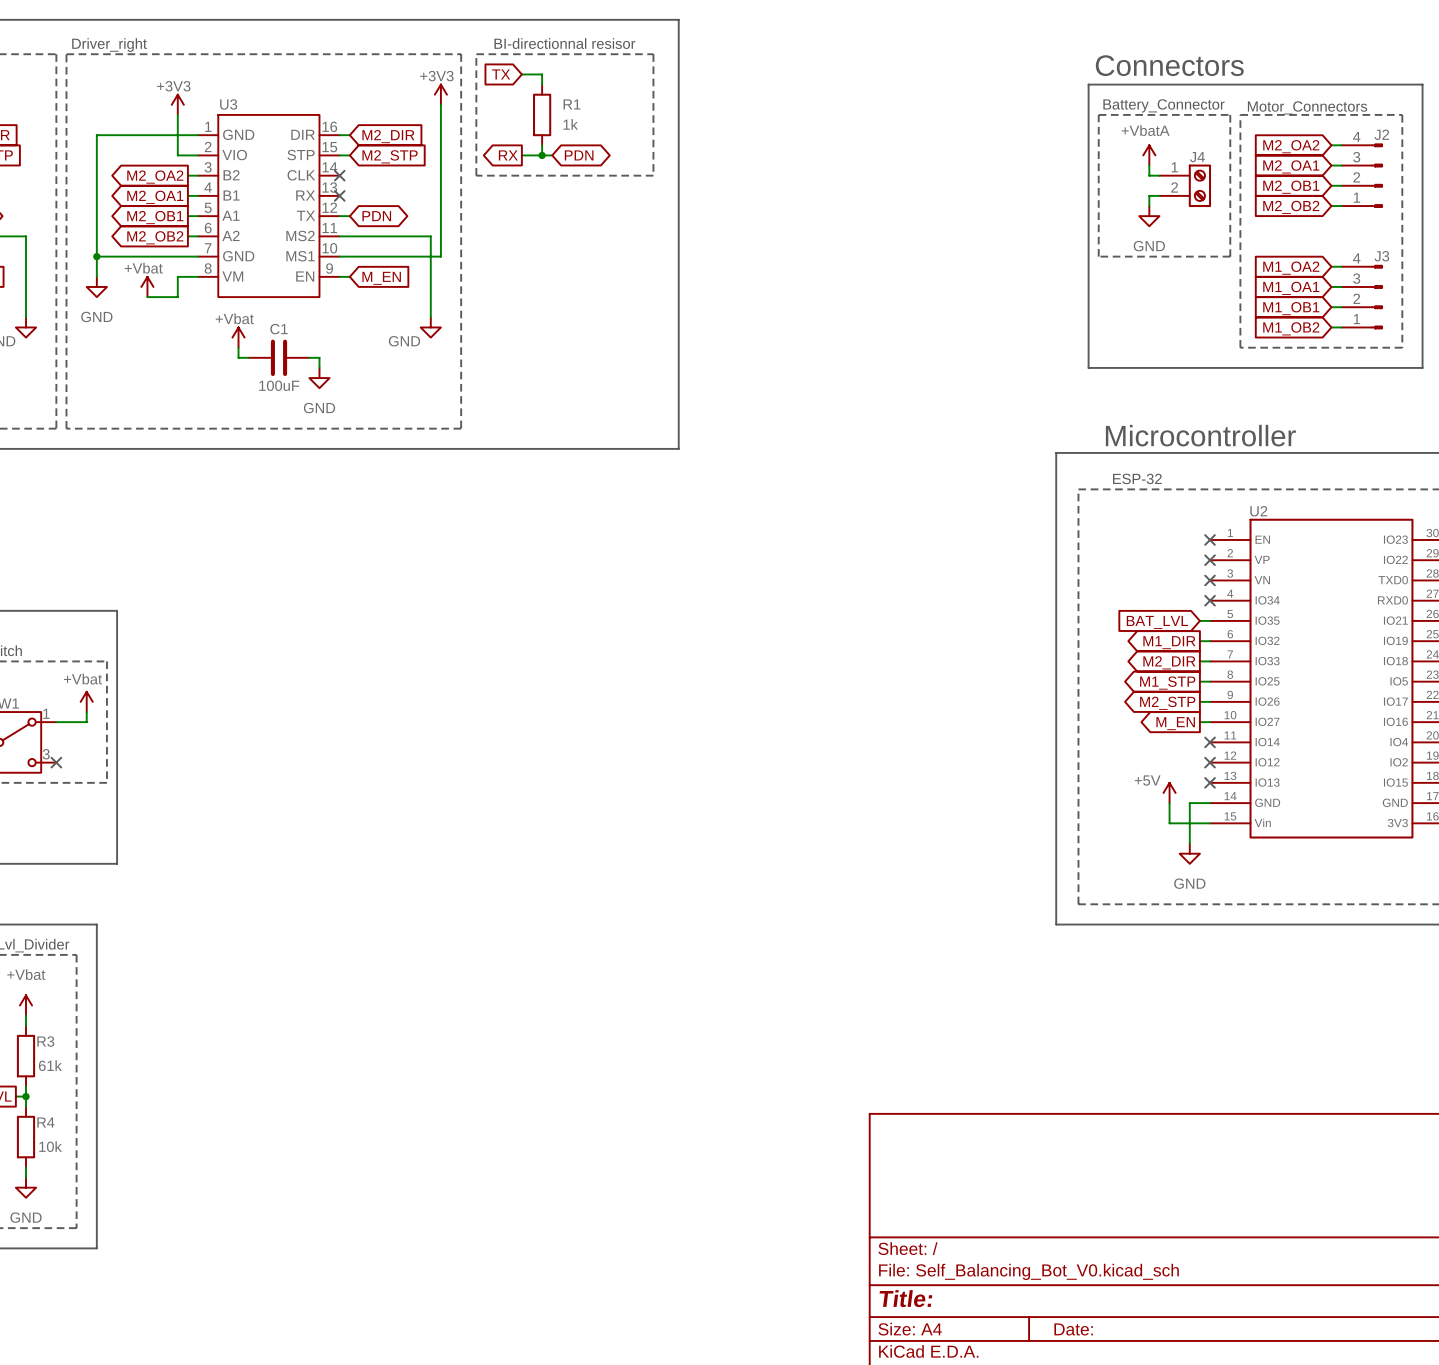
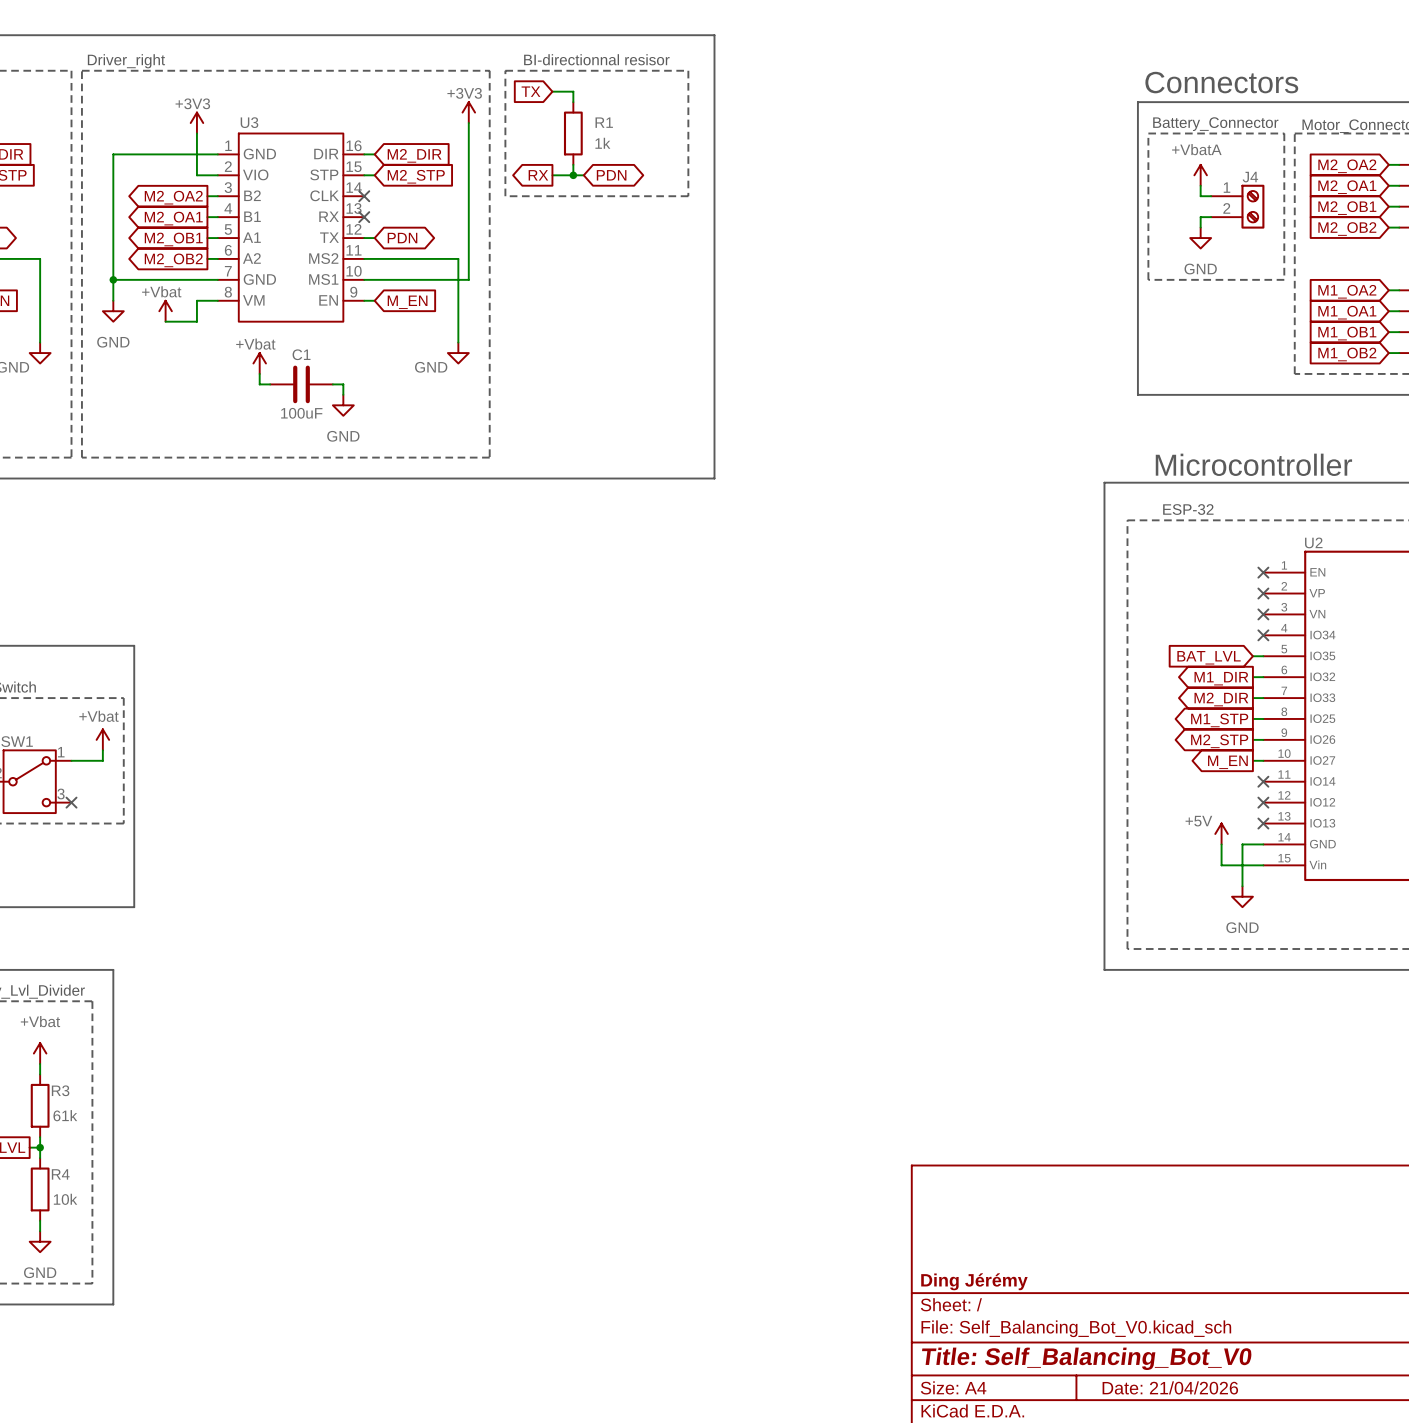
title block: none -> Ding Jérémy (974, 1281)
title block: Title: (905, 1298) -> Title: Self_Balancing_Bot_V0 (1086, 1358)
title block: Date: (1073, 1329) -> Date: 21/04/2026 (1170, 1387)

